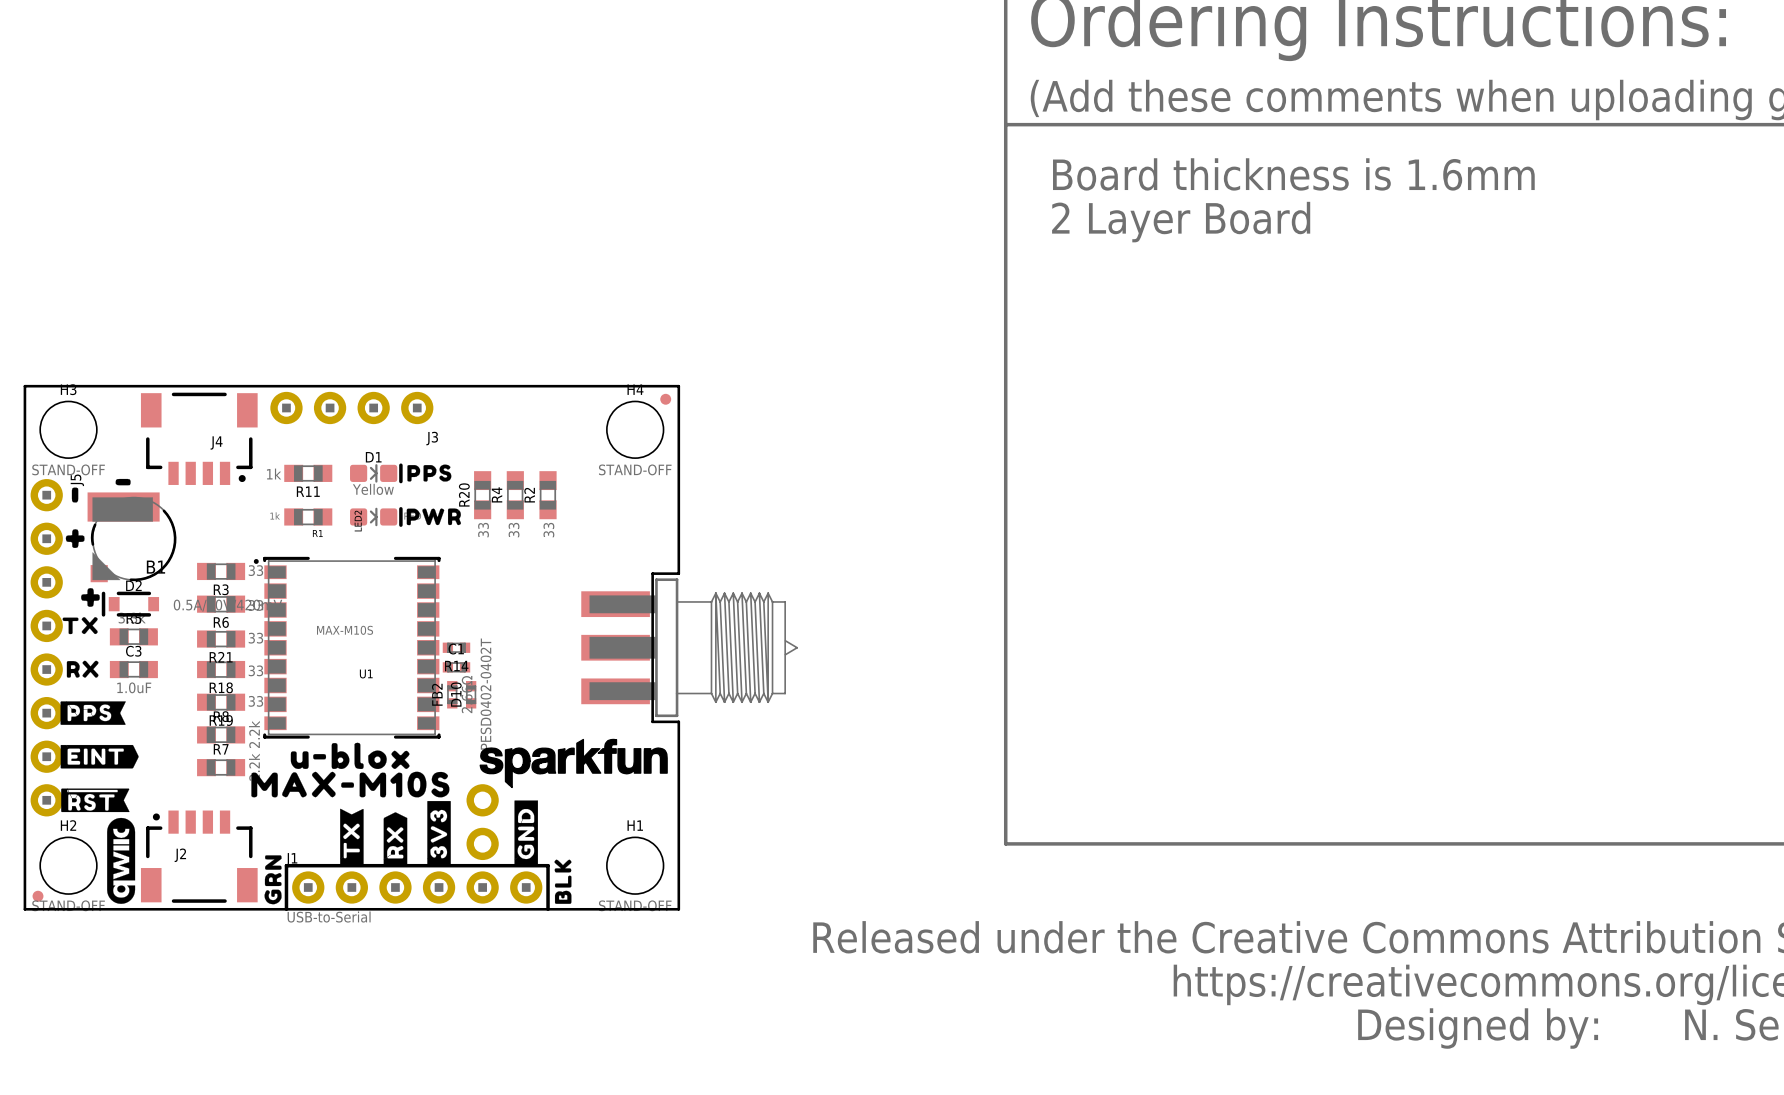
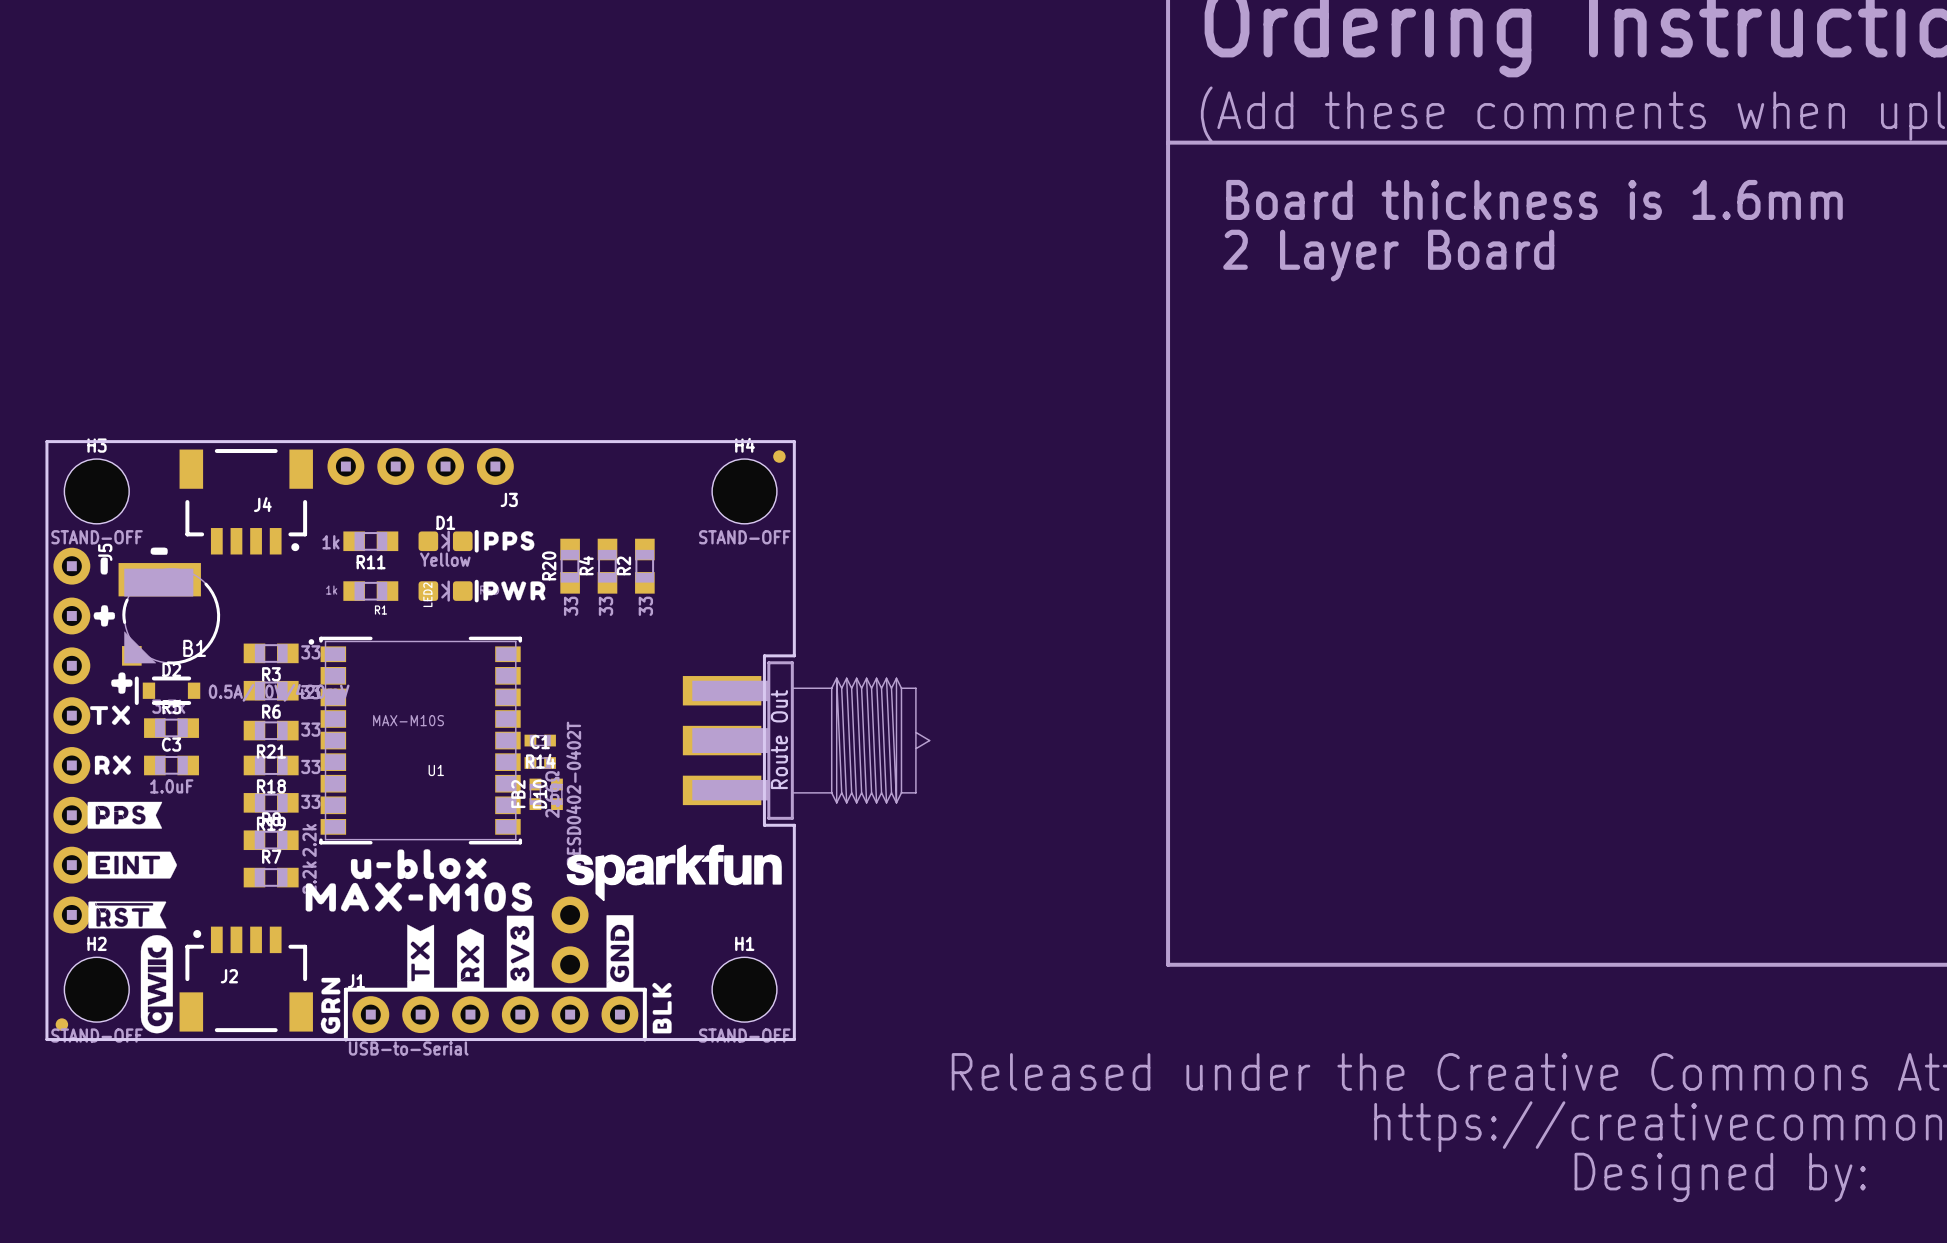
text: none -> Route Out (779, 739)

